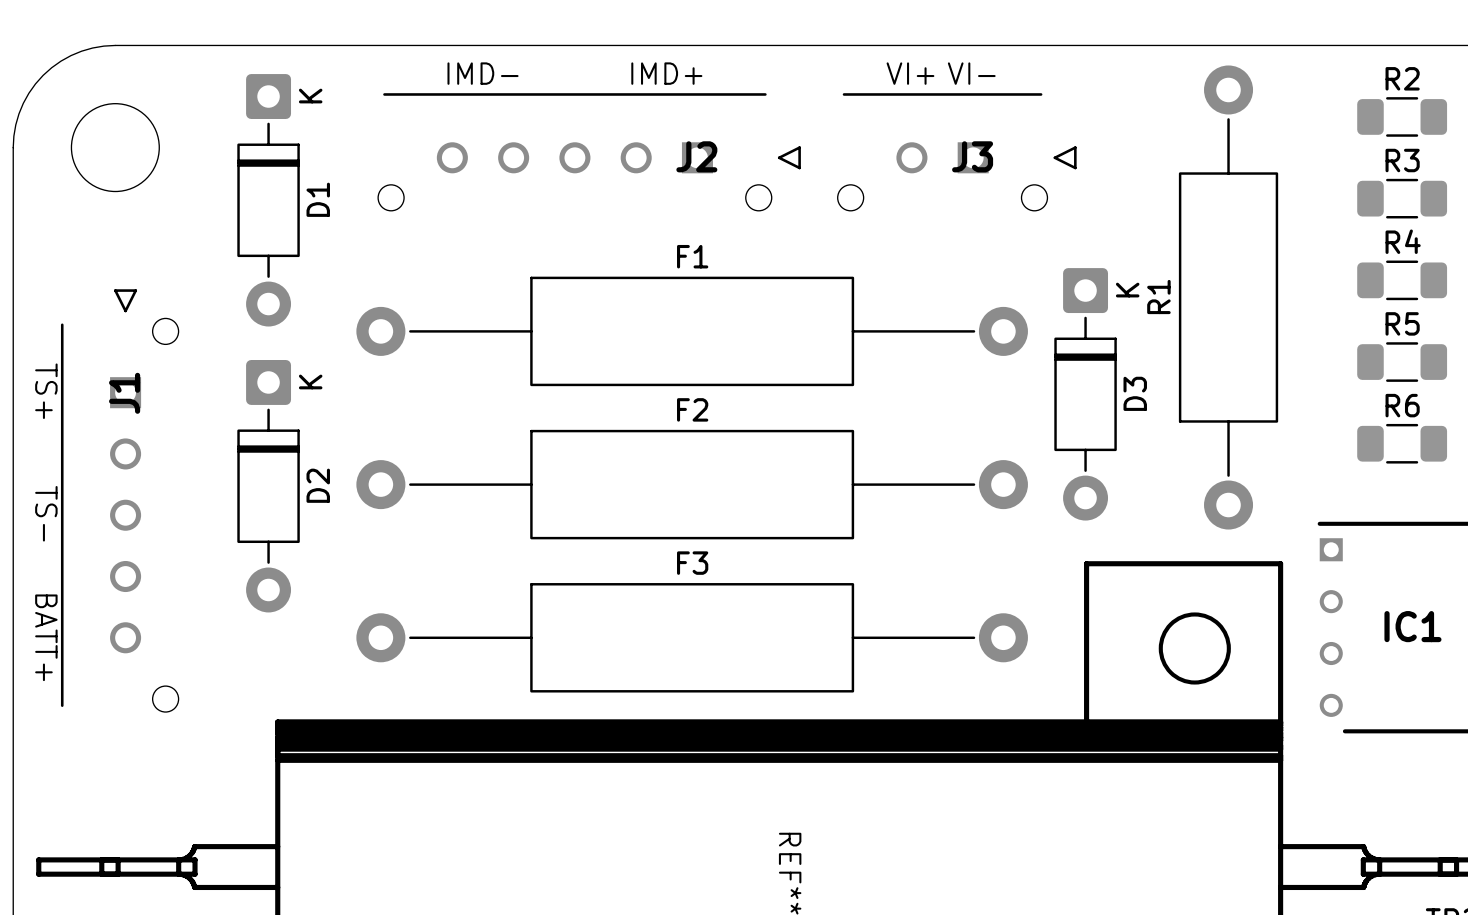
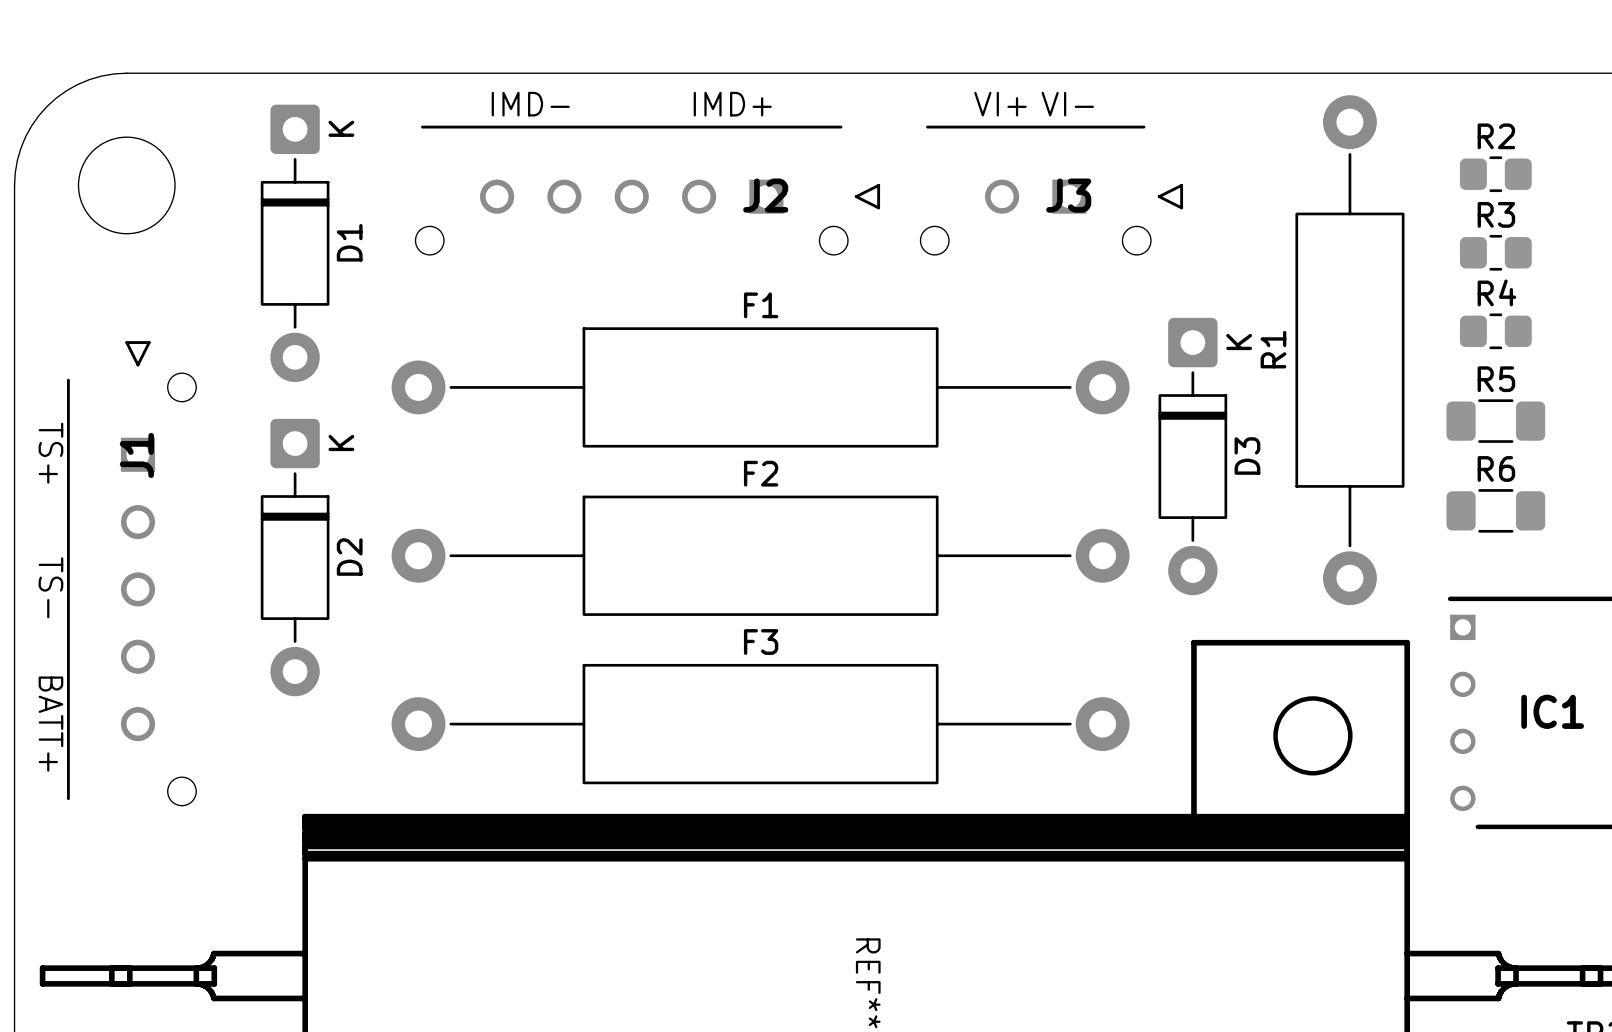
R2 footprint: [1357, 97, 1448, 137] -> [1459, 156, 1532, 193]
R3 footprint: [1357, 178, 1448, 219] -> [1459, 234, 1532, 271]
R4 footprint: [1357, 260, 1448, 301] -> [1459, 313, 1532, 350]
R5 position: (1402, 362) -> (1495, 421)
R6 position: (1402, 443) -> (1495, 510)

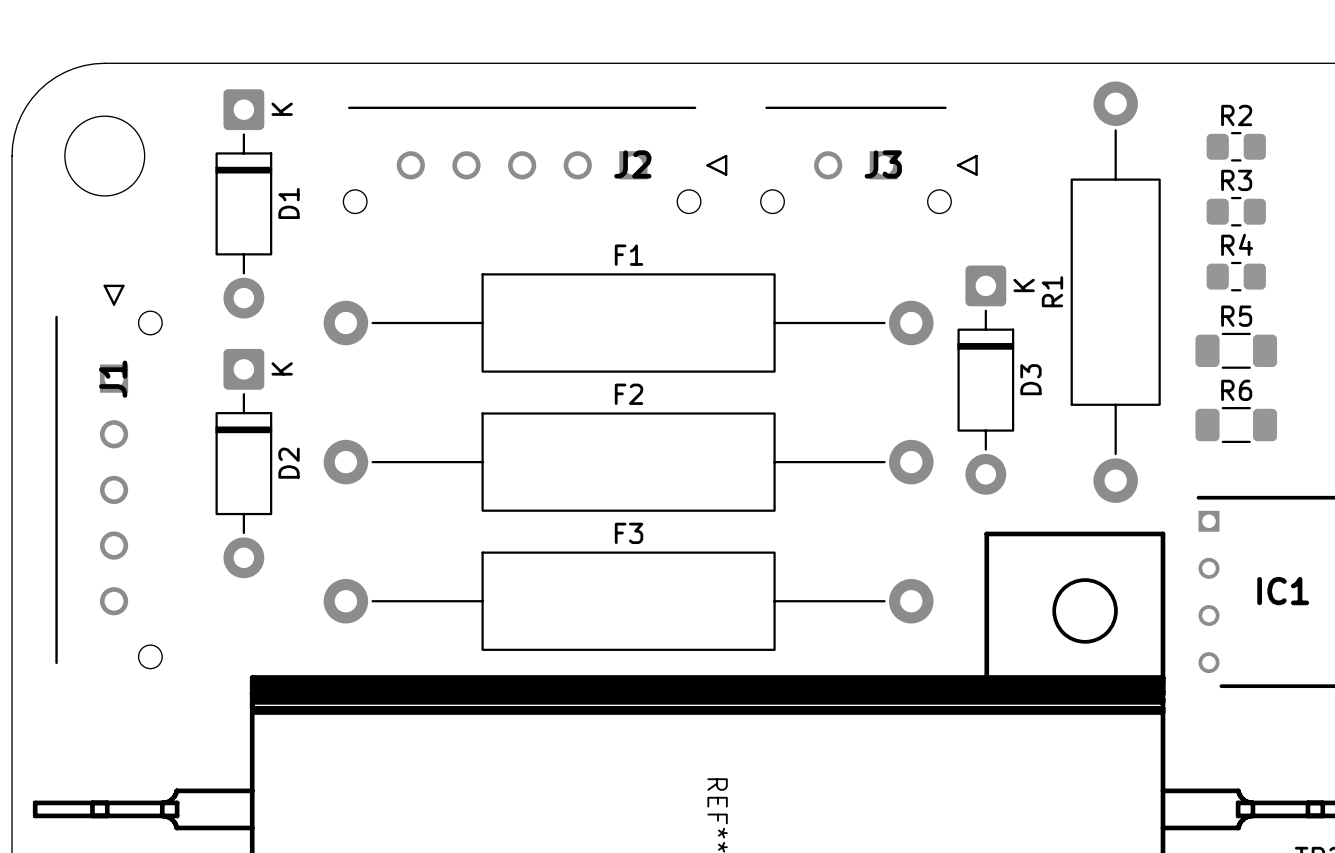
text: IMD- (530, 104) -> none
text: IMD+ (732, 104) -> none
text: VI+ (1000, 104) -> none
text: VI- (1067, 104) -> none
text: TS+ (50, 453) -> none
text: TS- (50, 587) -> none
text: BATT+ (50, 724) -> none

